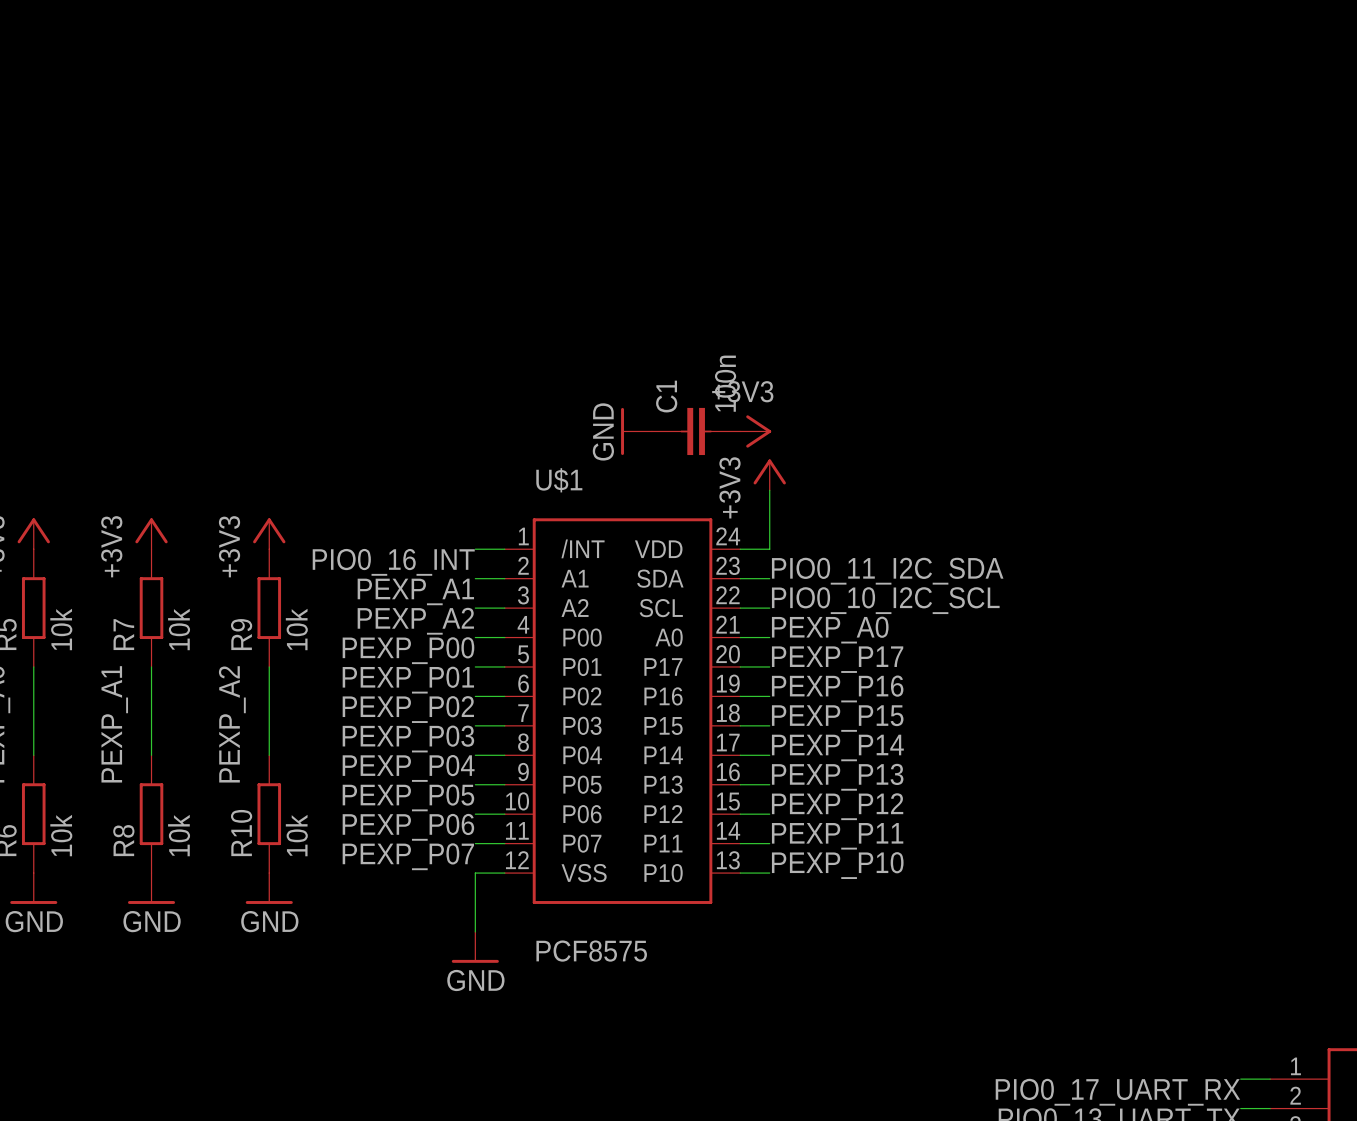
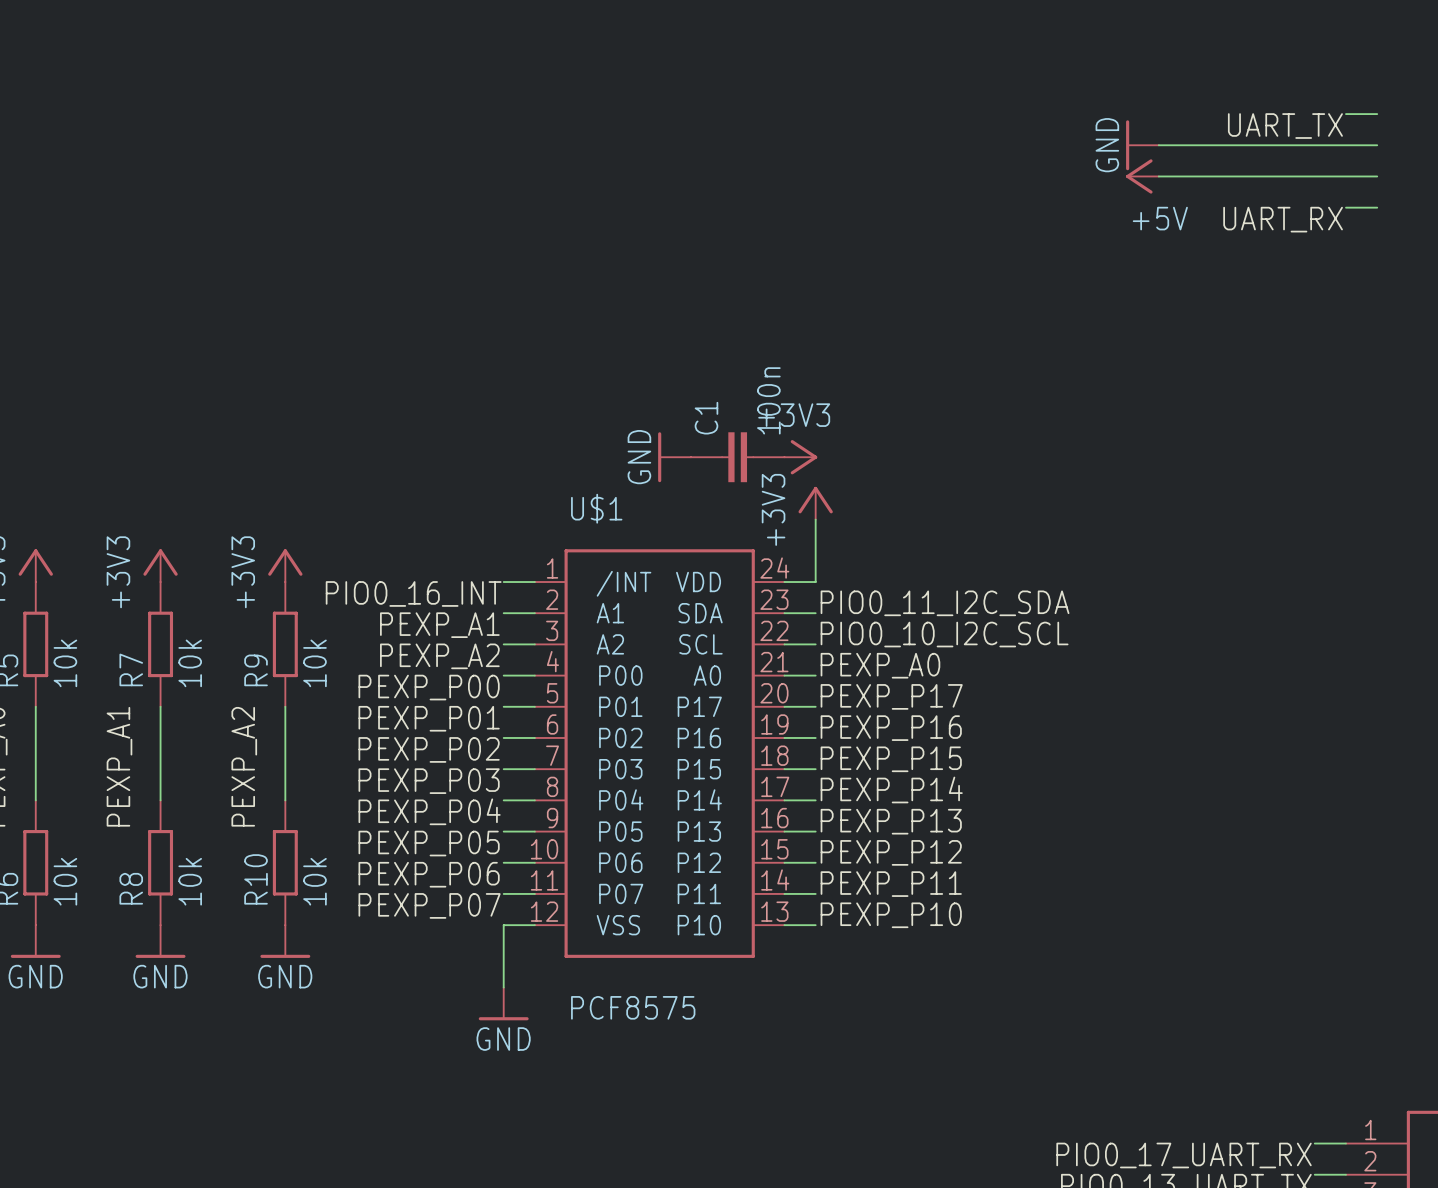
wire: none -> (1345, 114) (1377, 114)
label: none -> UART_TX (1285, 126)
power symbol: none -> GND (1142, 145)
wire: none -> (1158, 145) (1377, 145)
power symbol: none -> +5V (1142, 176)
wire: none -> (1158, 176) (1377, 176)
wire: none -> (1345, 207) (1377, 207)
label: none -> UART_RX (1283, 219)

